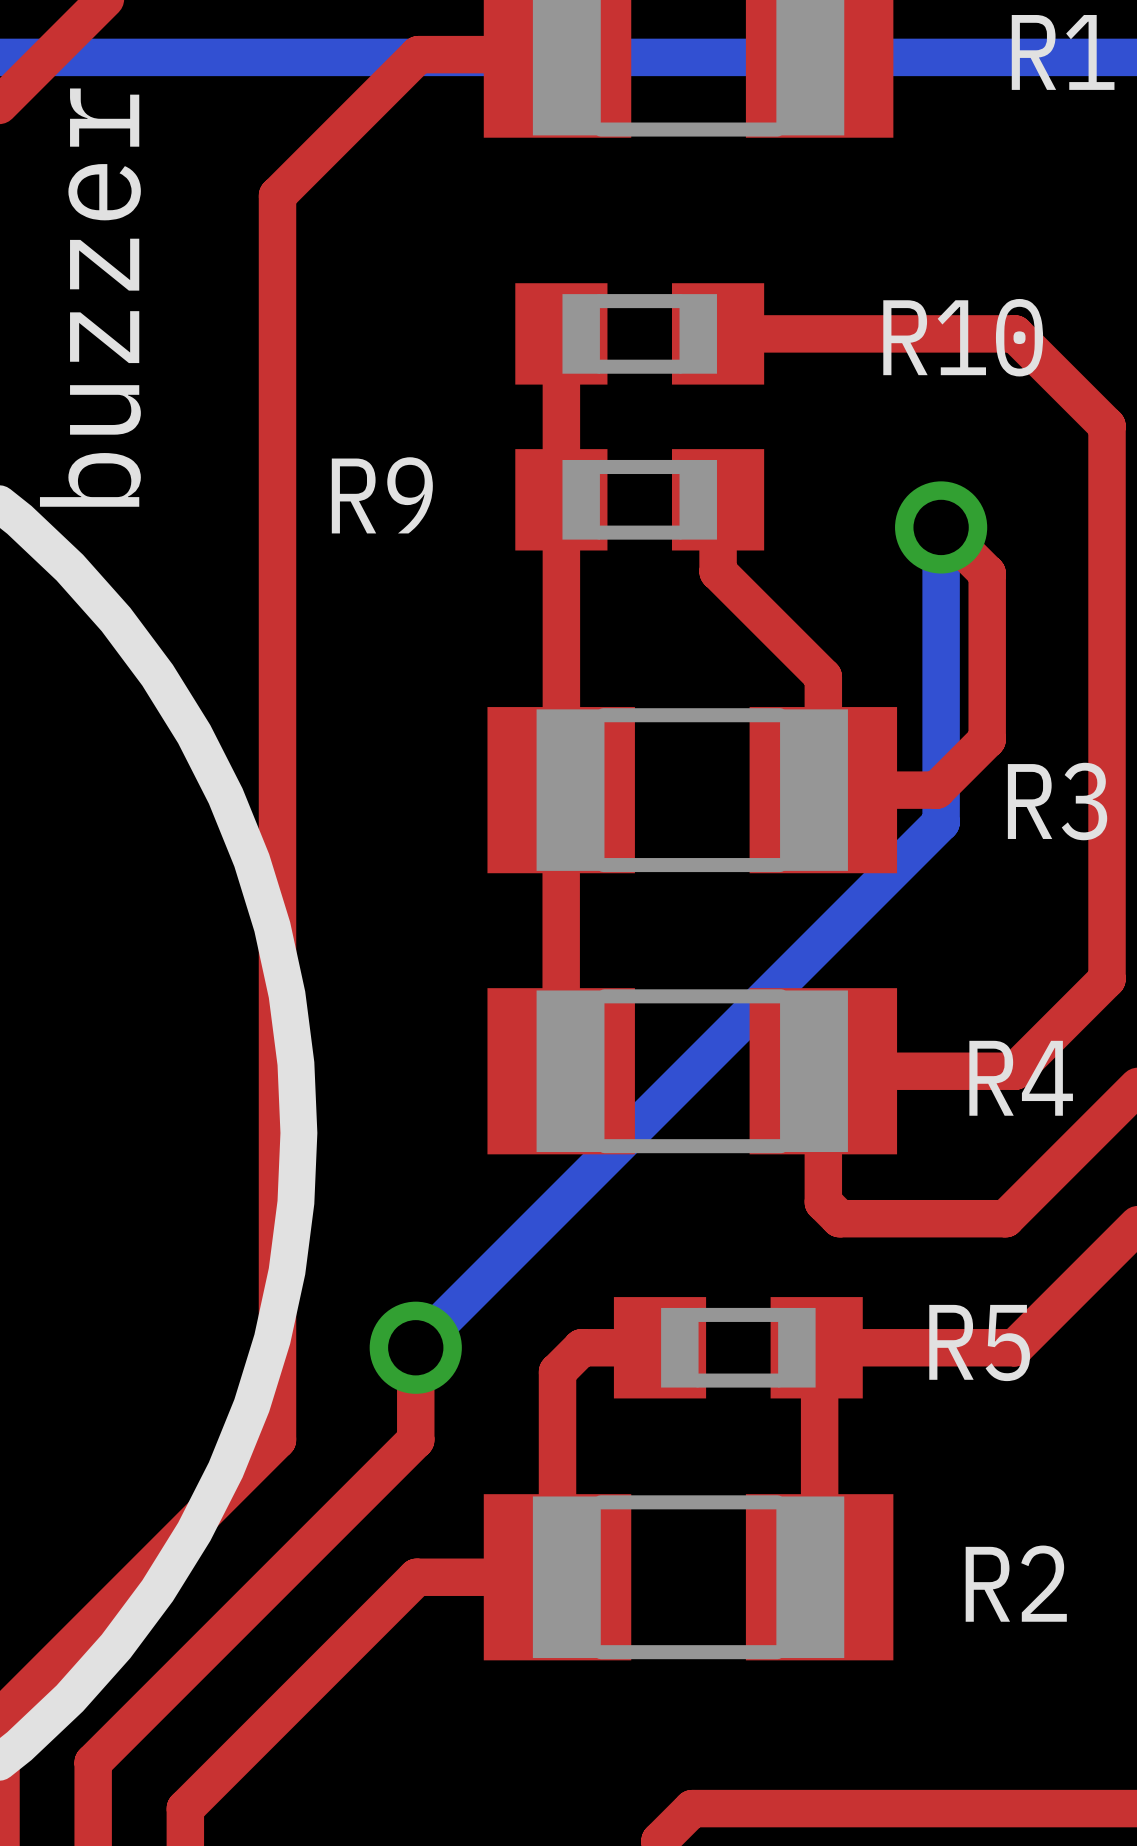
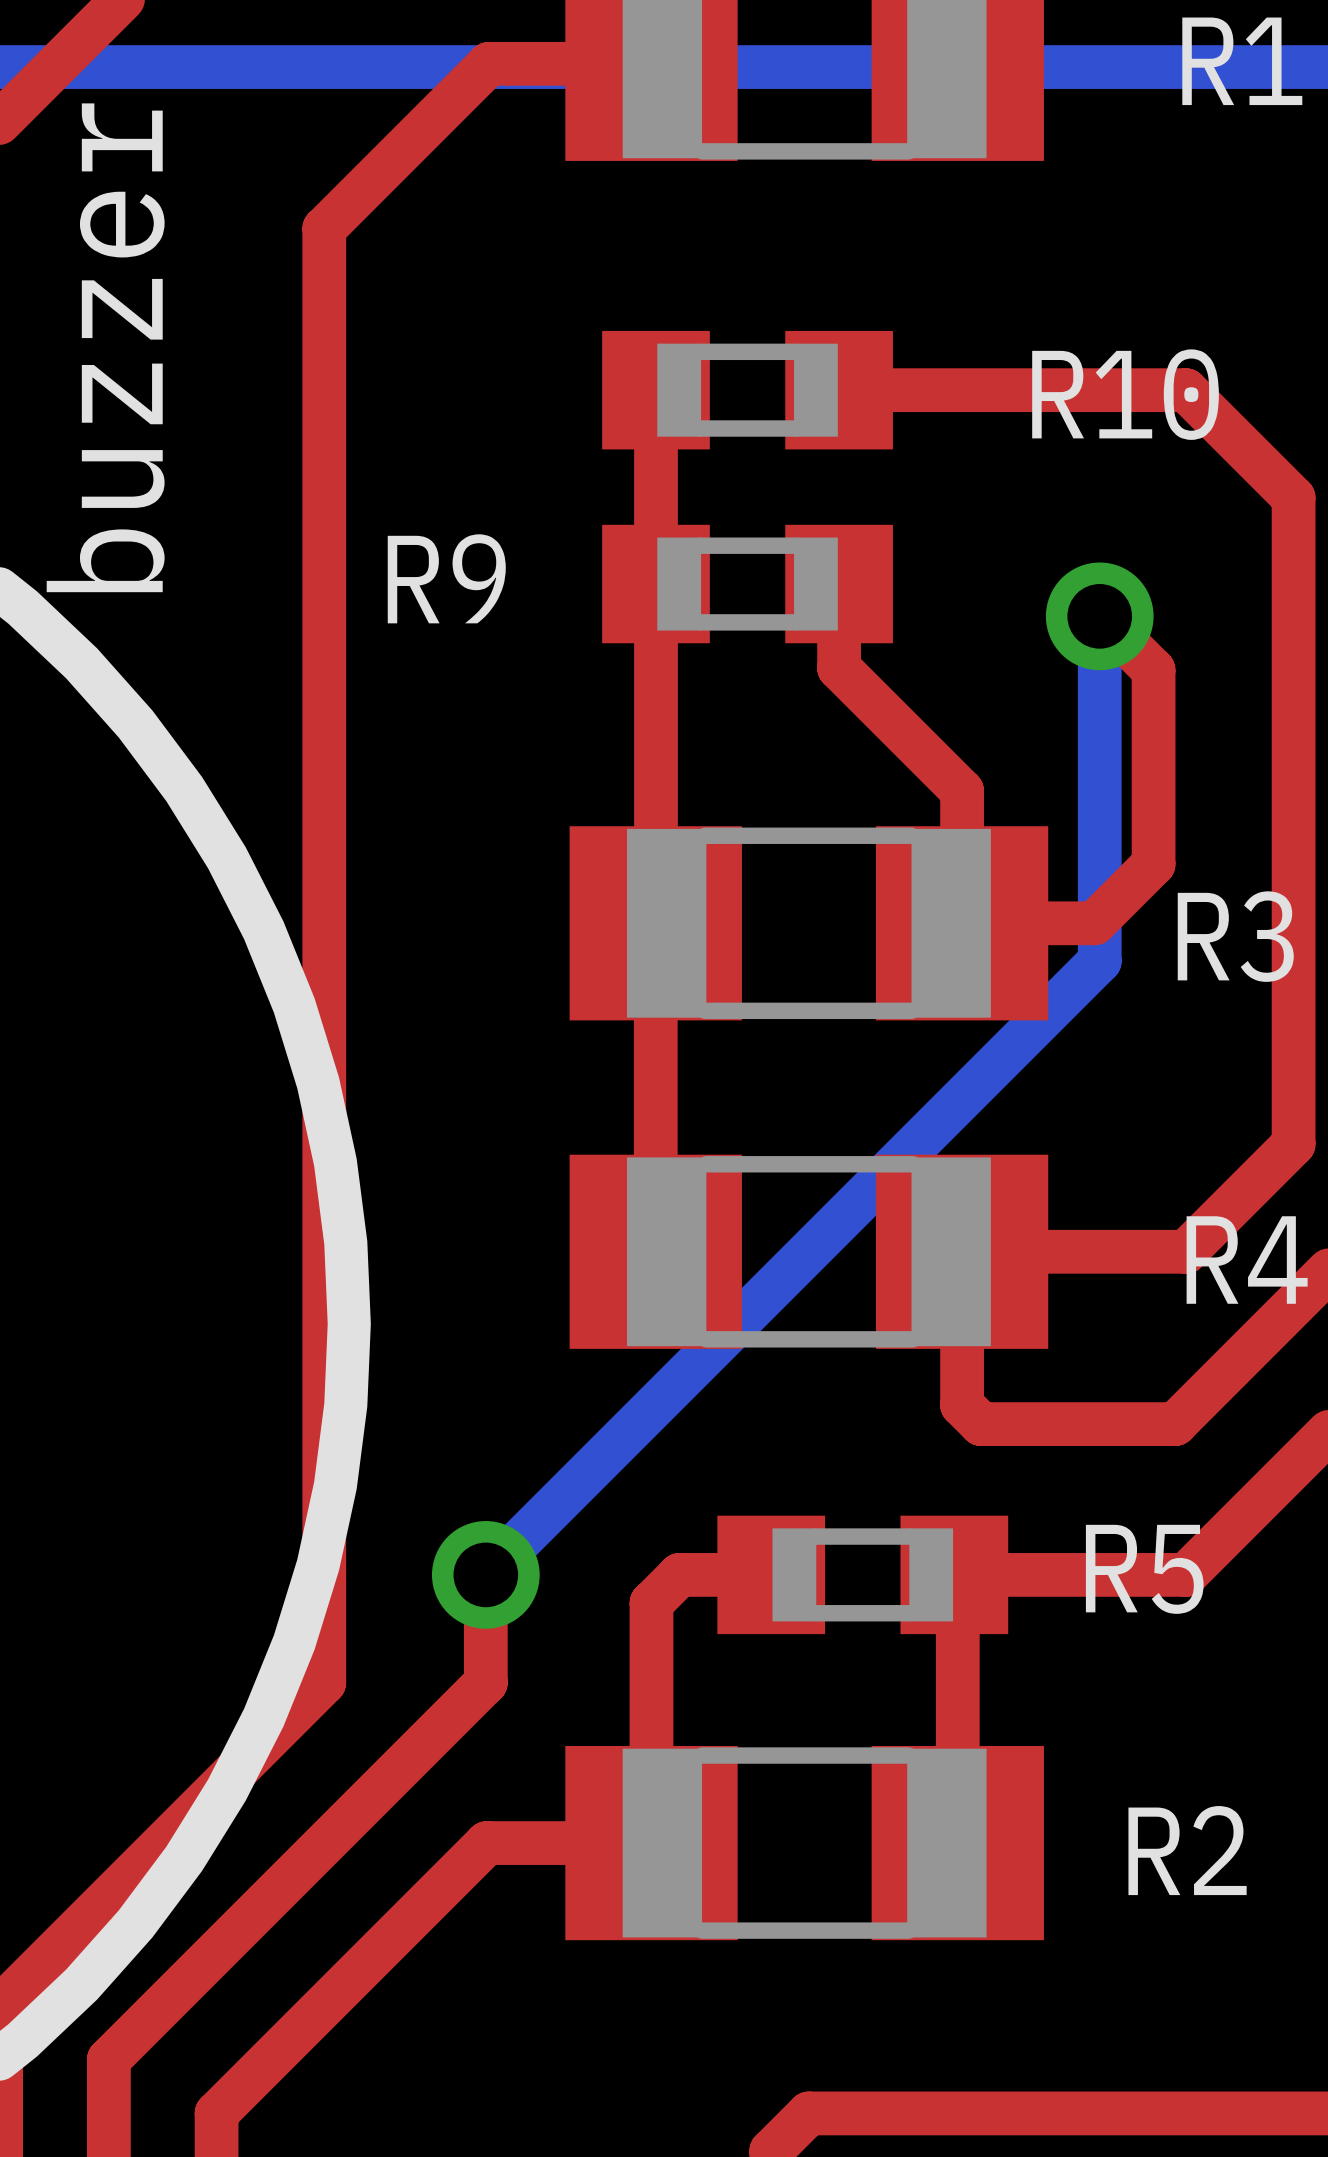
R4 name position: R4 (1021, 1078) -> R4 (1247, 1260)

